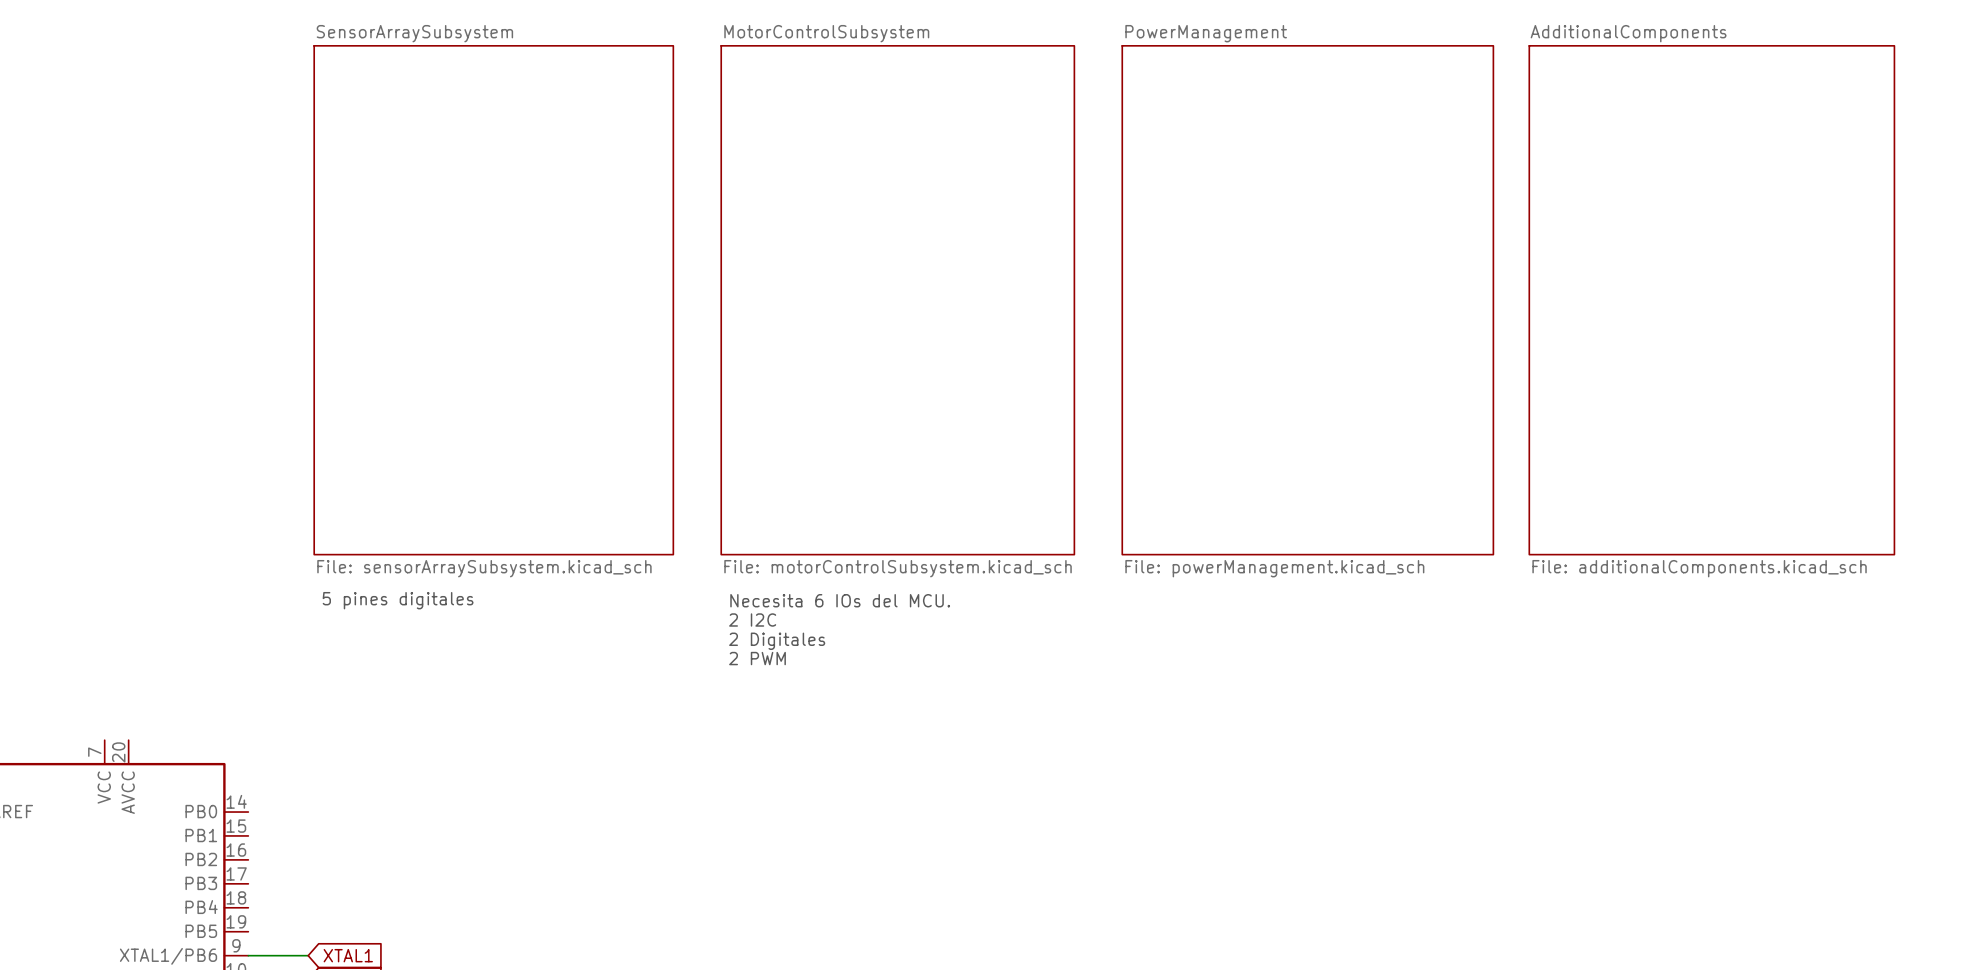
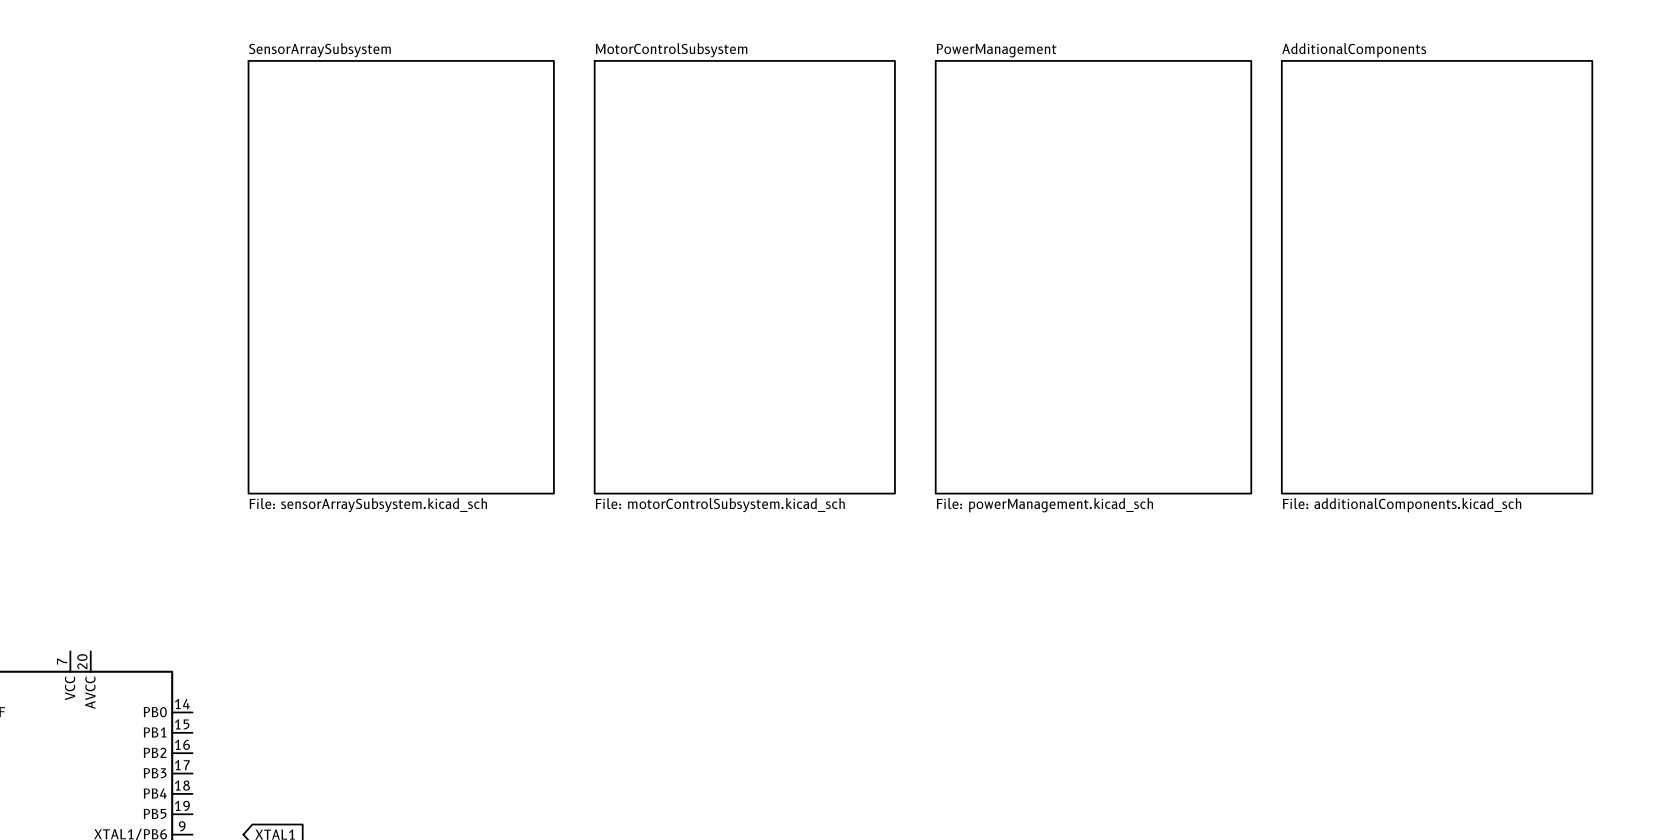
text: 5 pines digitales (398, 600) -> none
text: Necesita 6 IOs del MCU. (840, 600) -> none
text: 2 I2C (752, 620) -> none
text: 2 Digitales (777, 641) -> none
text: 2 PWM (757, 658) -> none
wire: (248, 955) (308, 955) -> none

